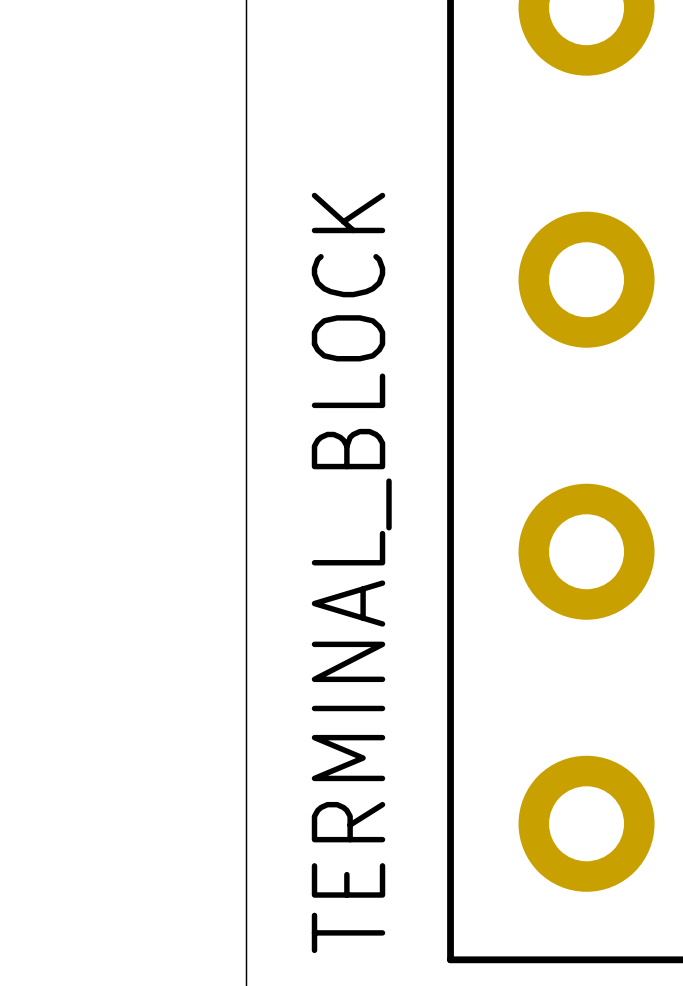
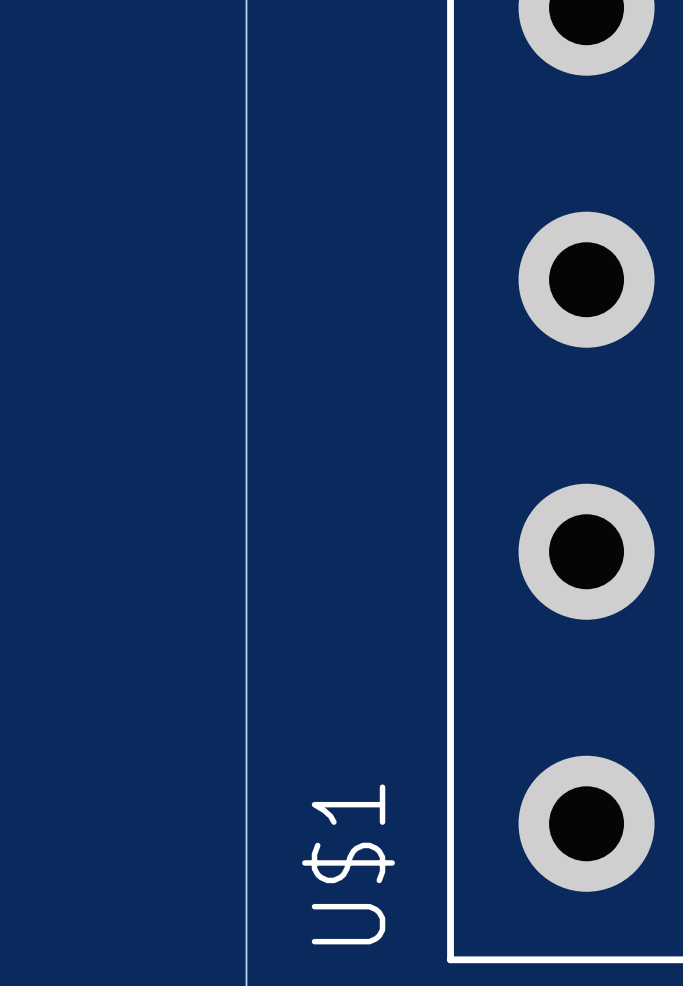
TERMINAL_BLOCK name: TERMINAL_BLOCK (351, 572) -> U$1 (348, 864)

